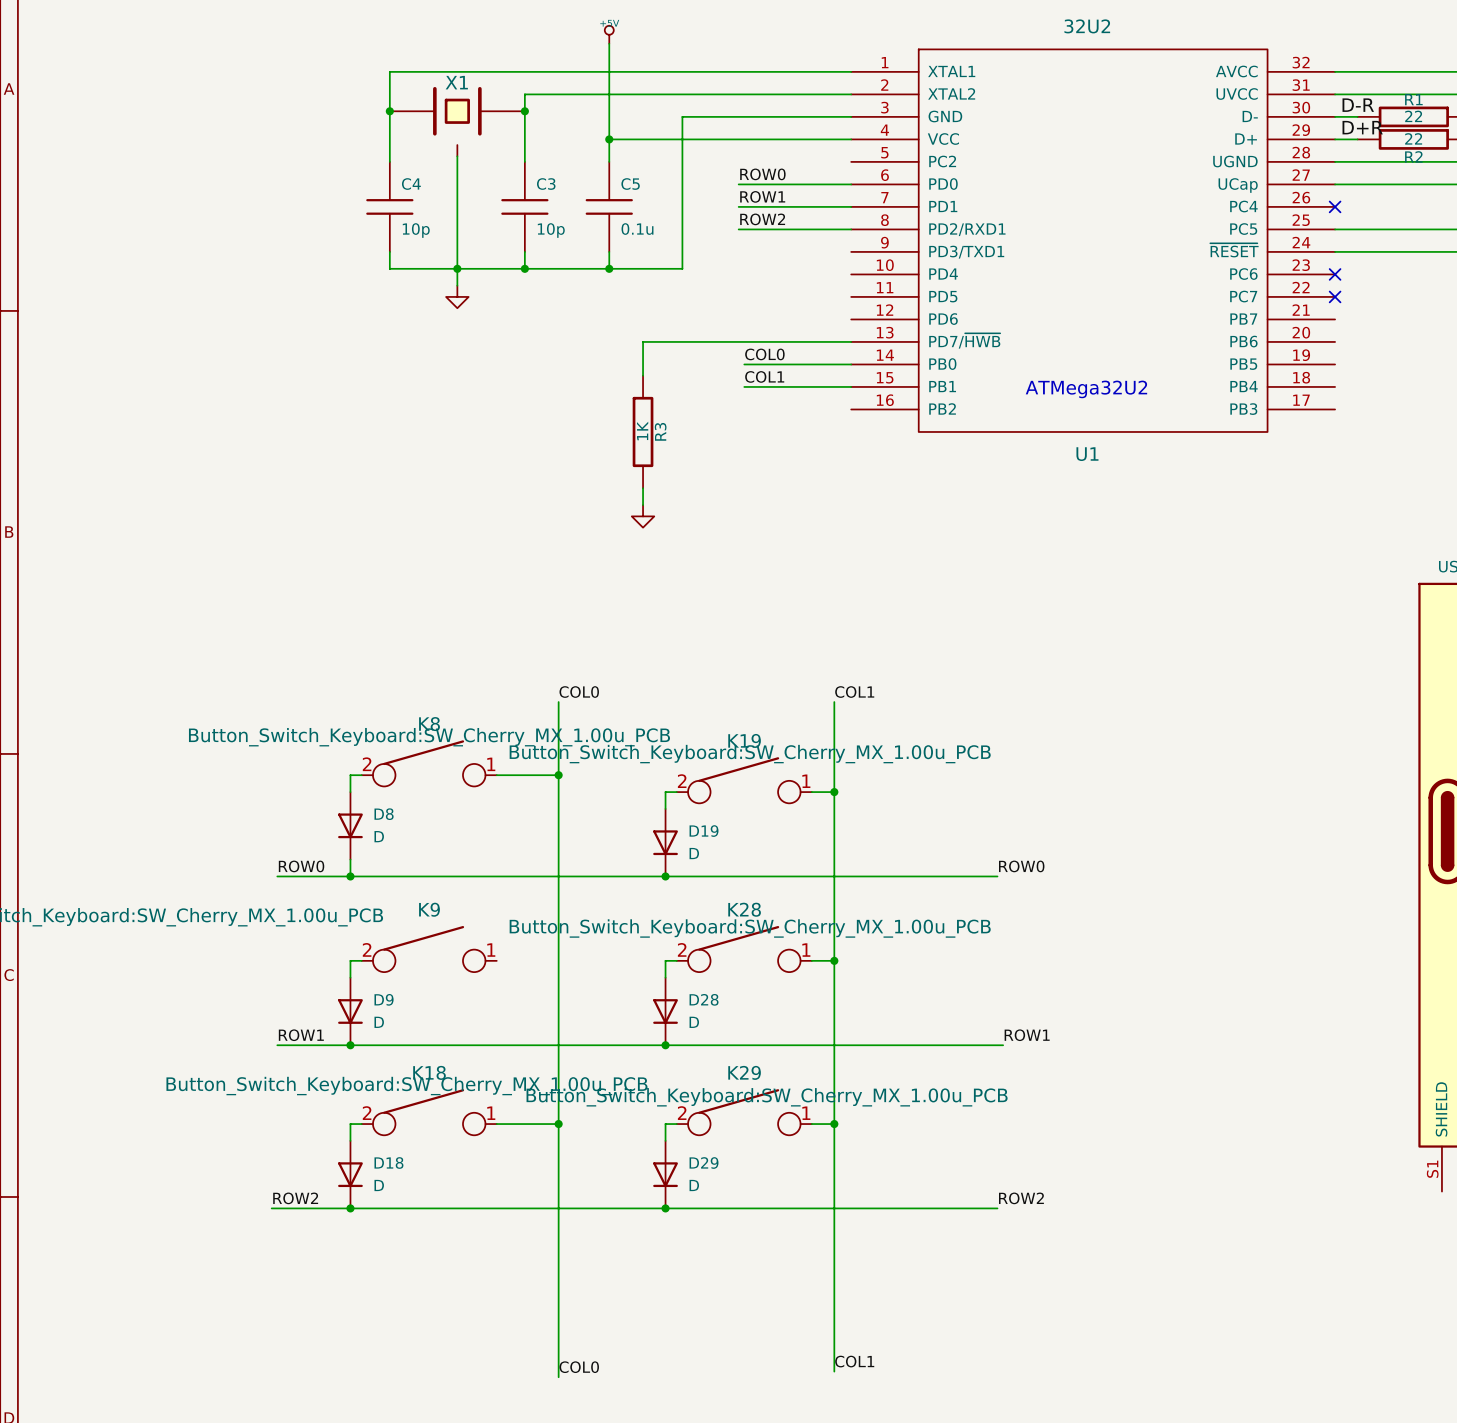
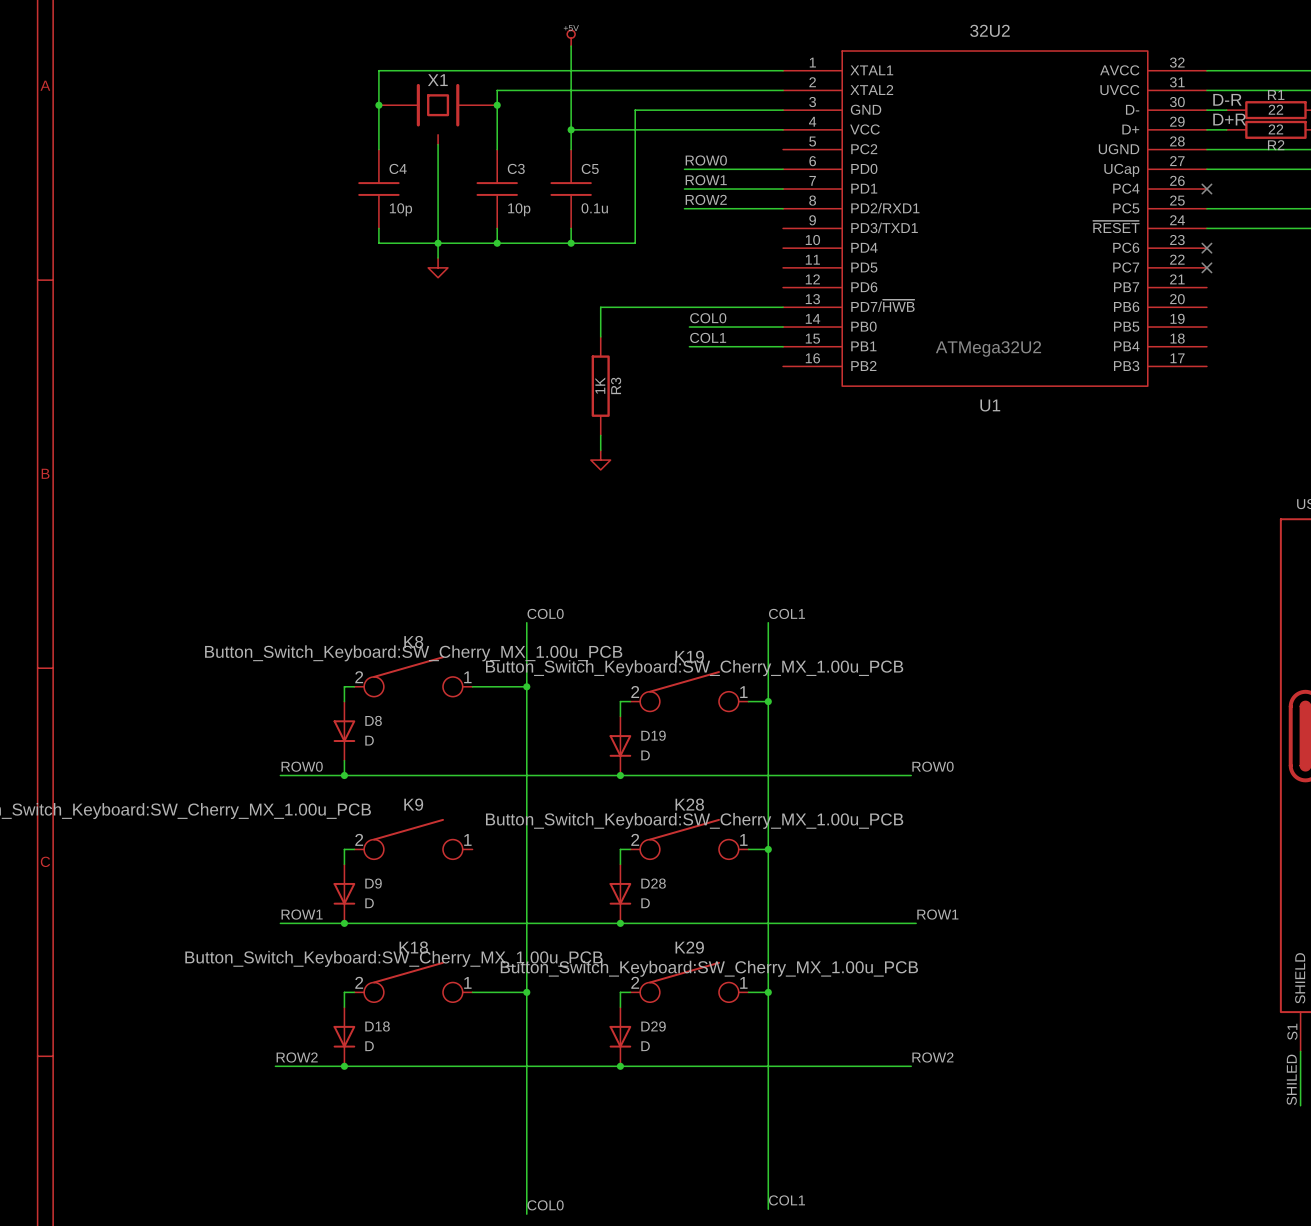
wire: none -> (1300, 1051) (1300, 1105)
label: none -> SHILED (1291, 1079)

